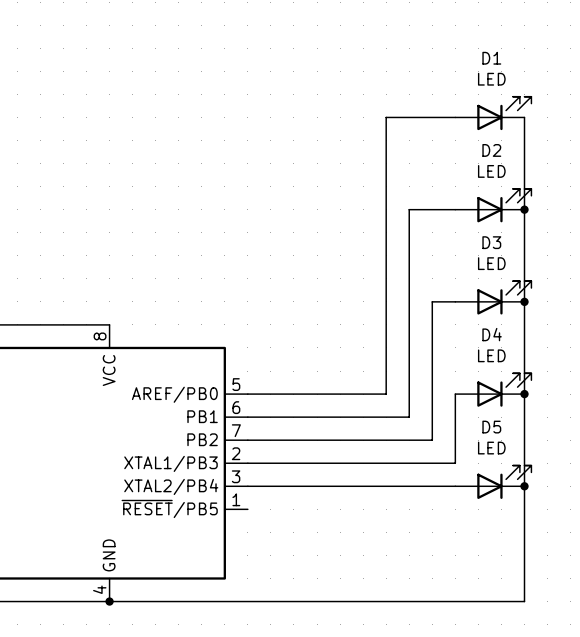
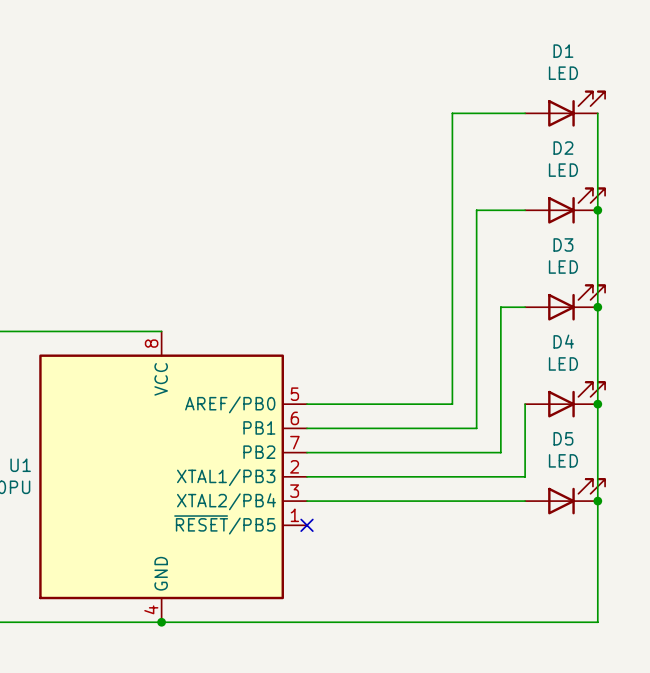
no-connect mark: none -> (307, 525)

